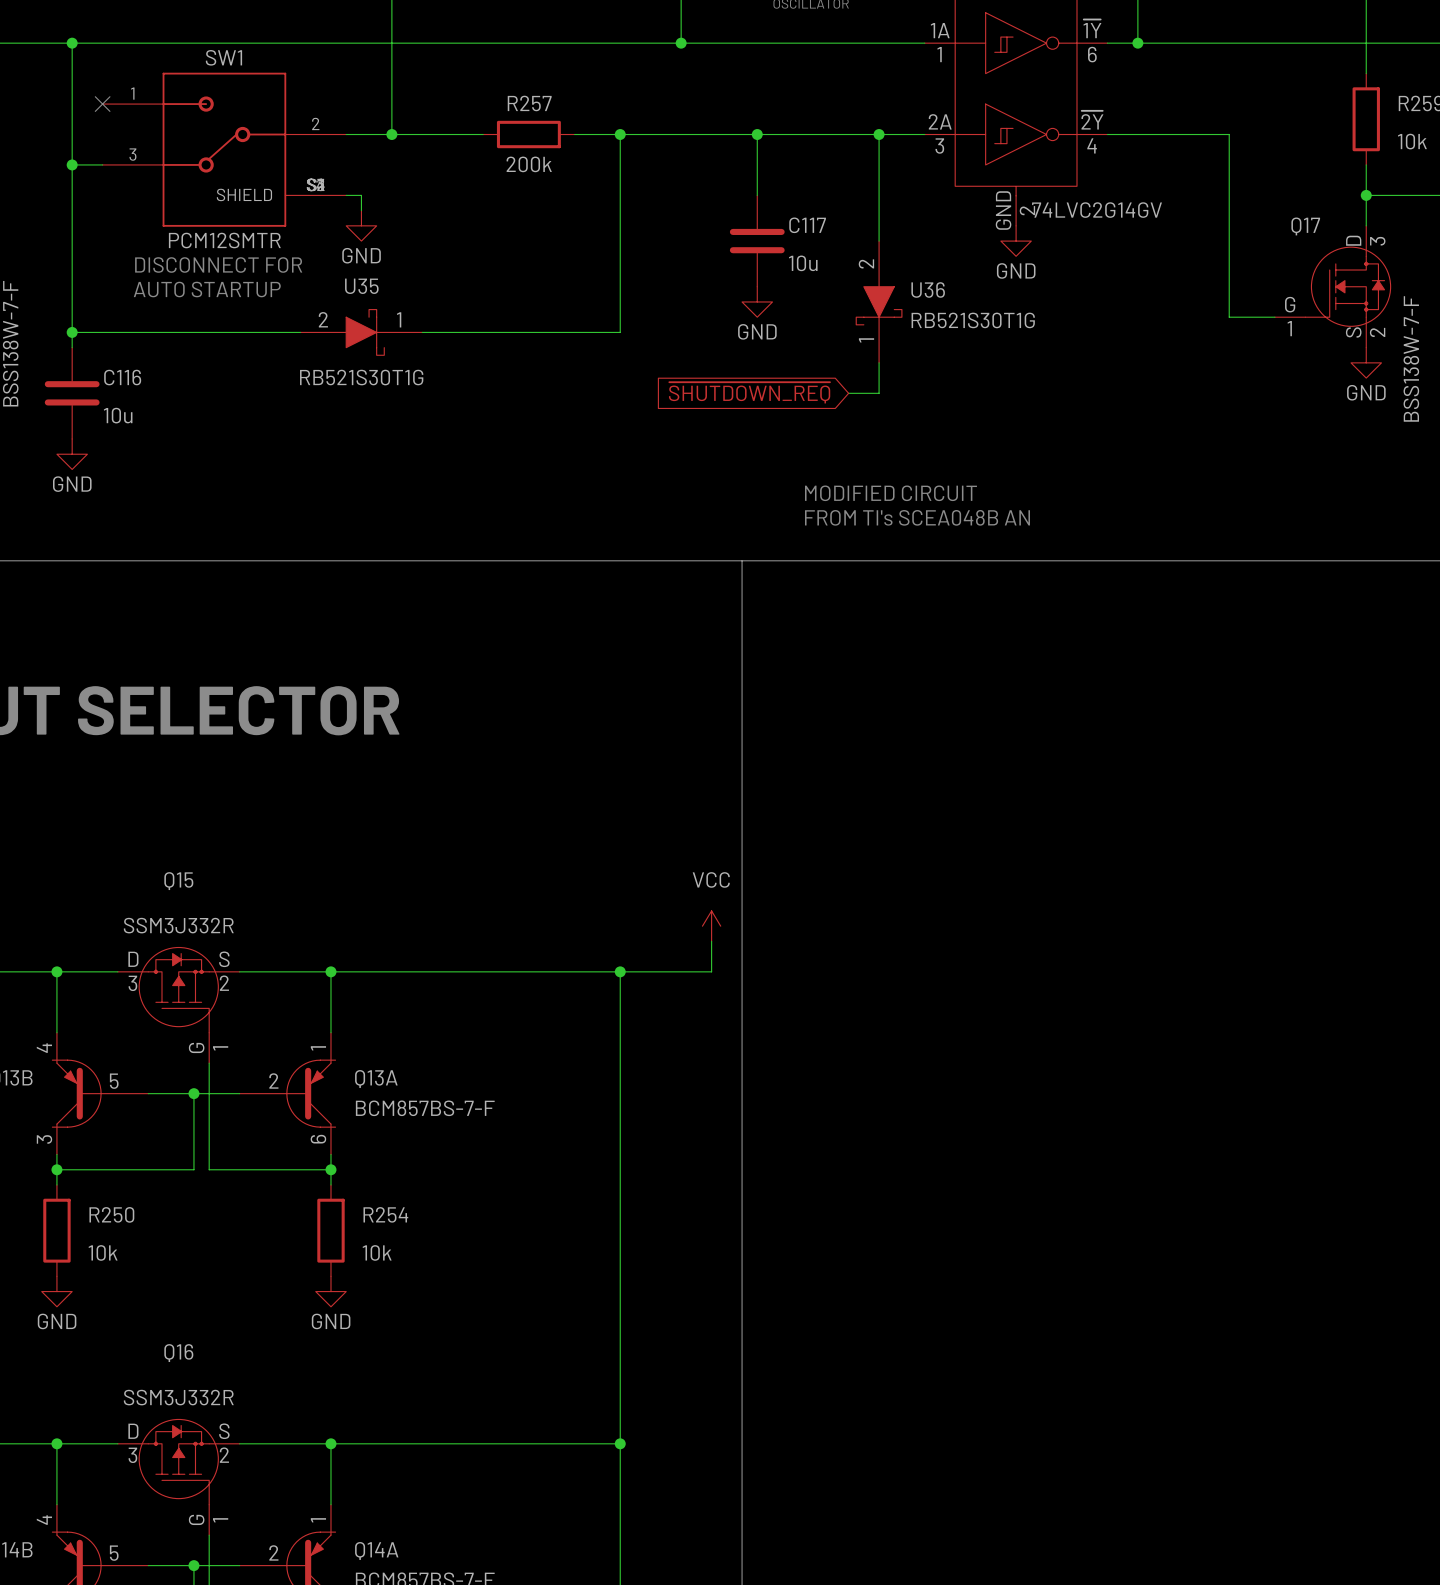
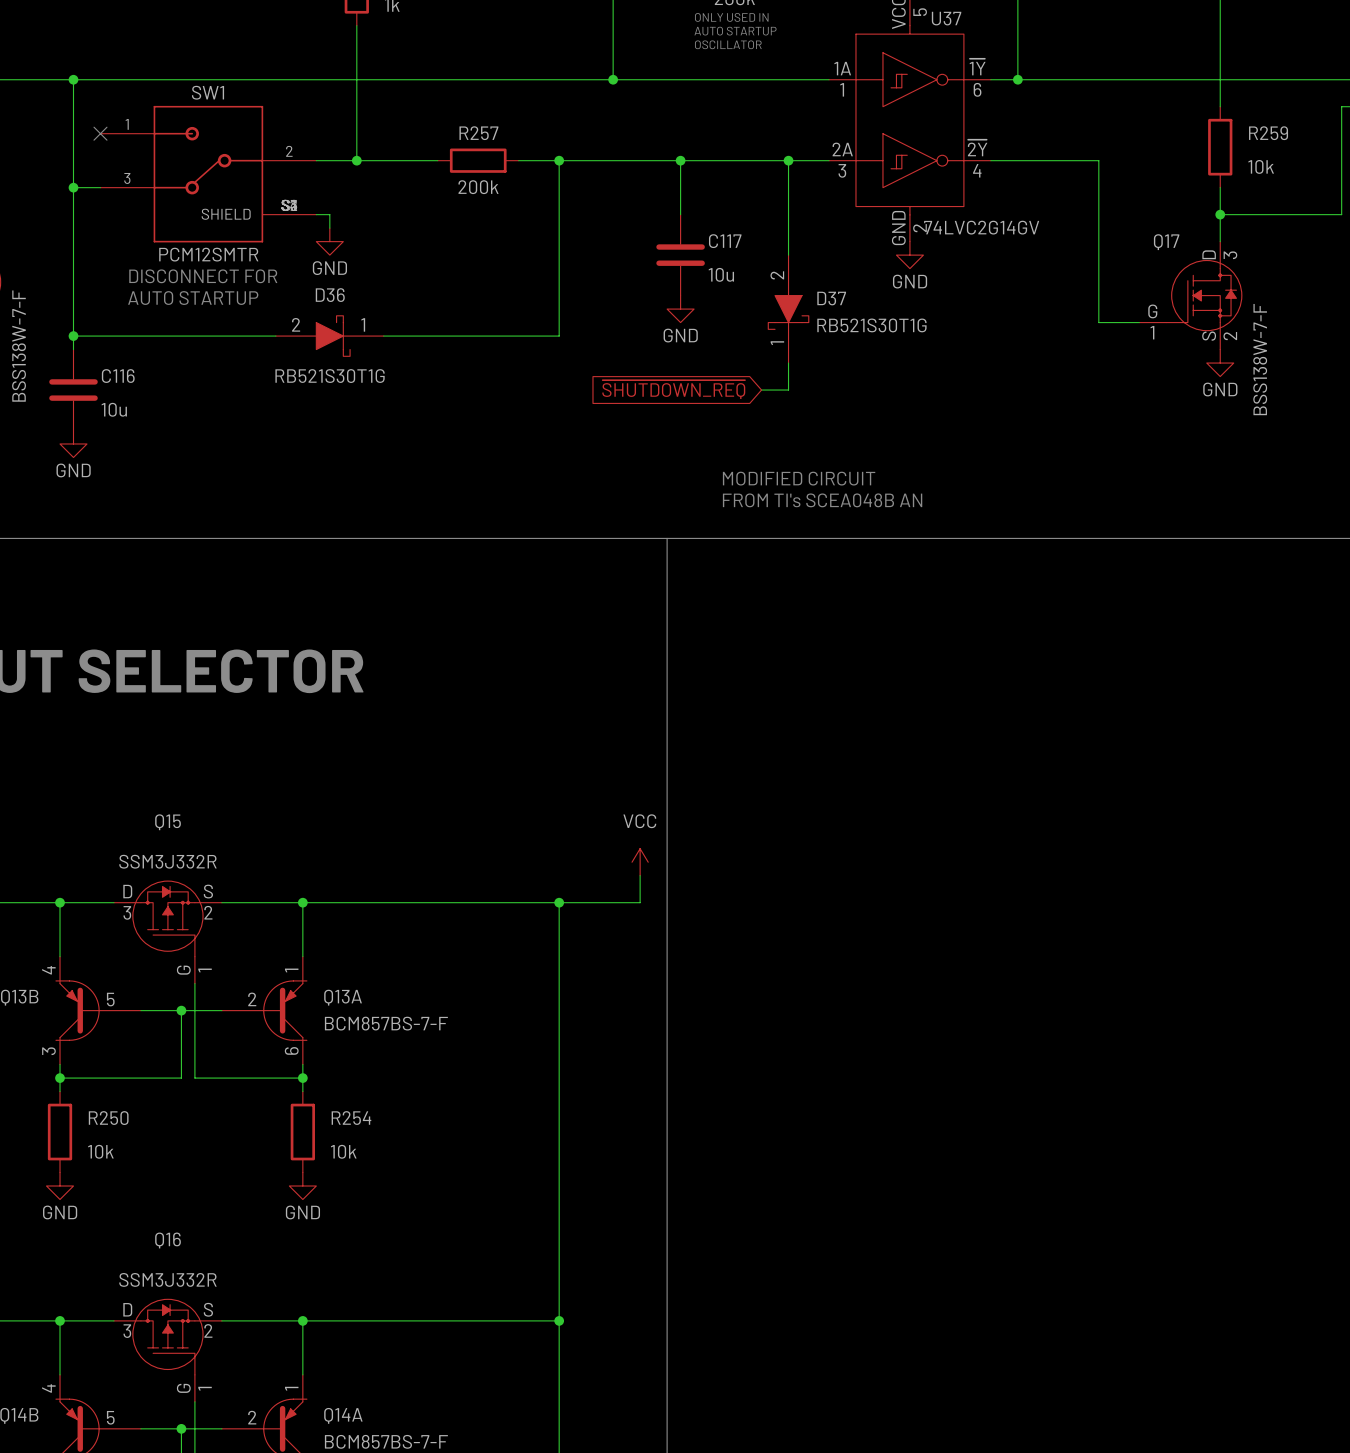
U35 name: U35 (361, 286) -> D36 (330, 295)
U36 name: U36 (928, 289) -> D37 (831, 298)

